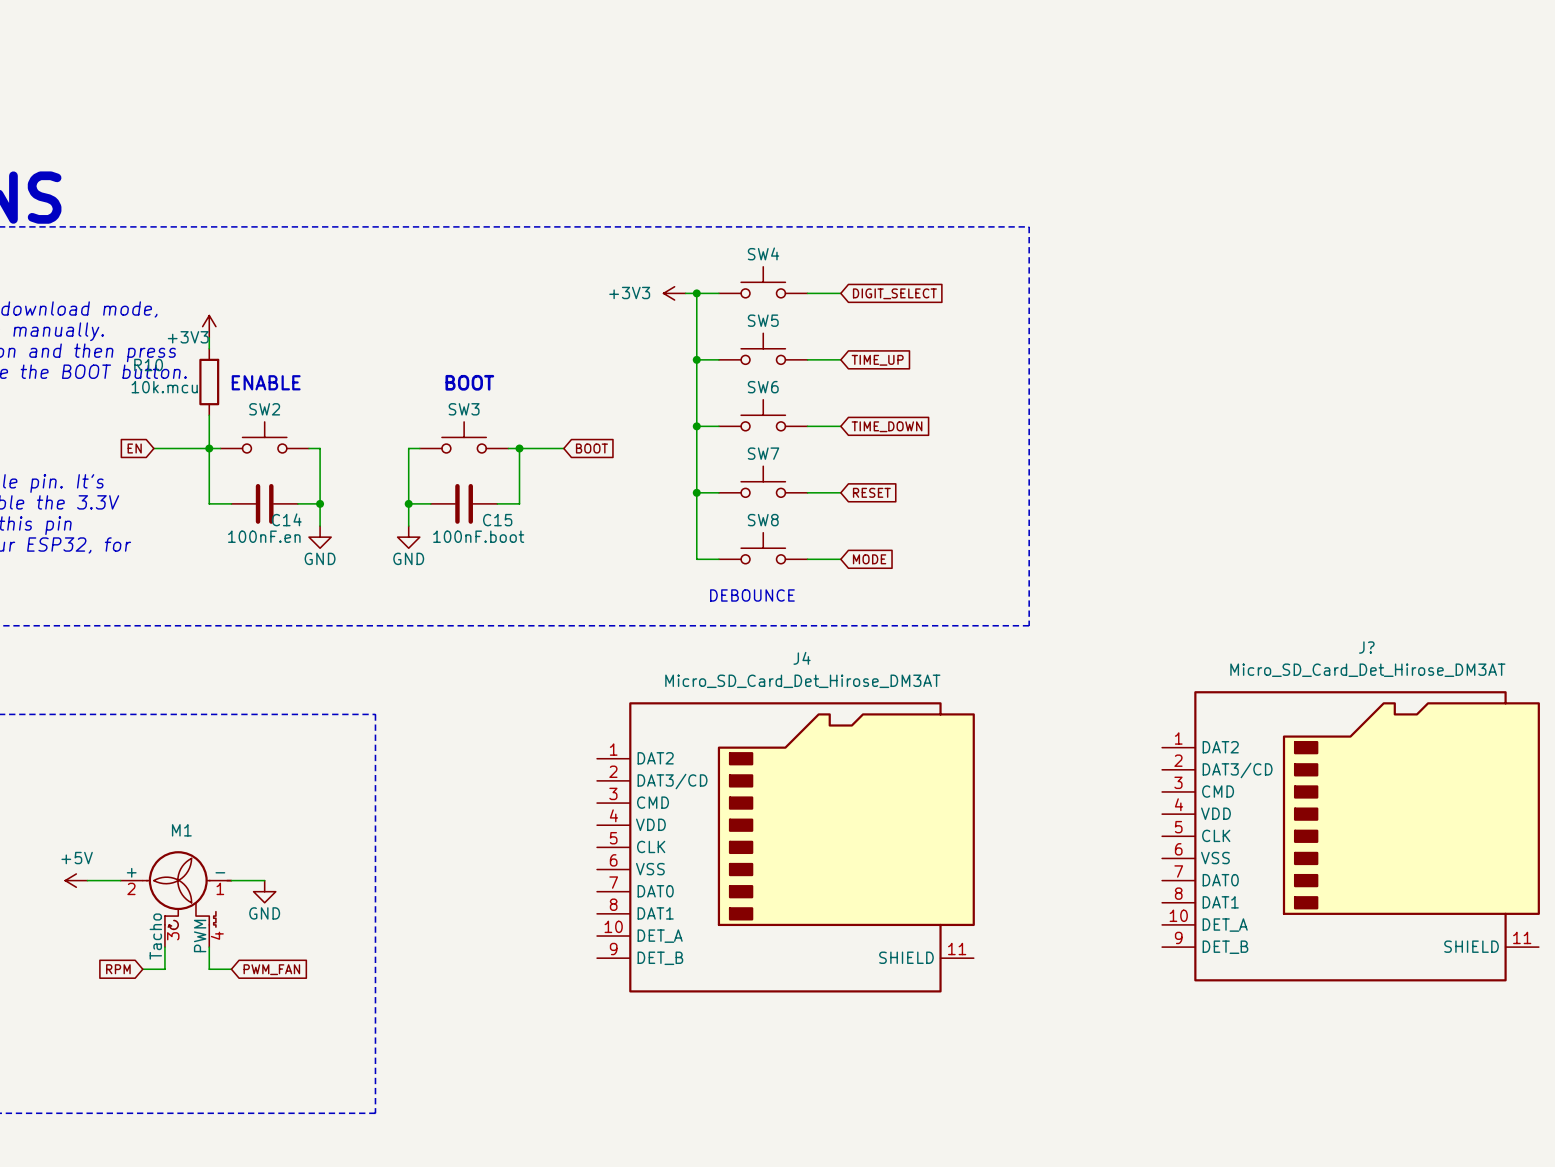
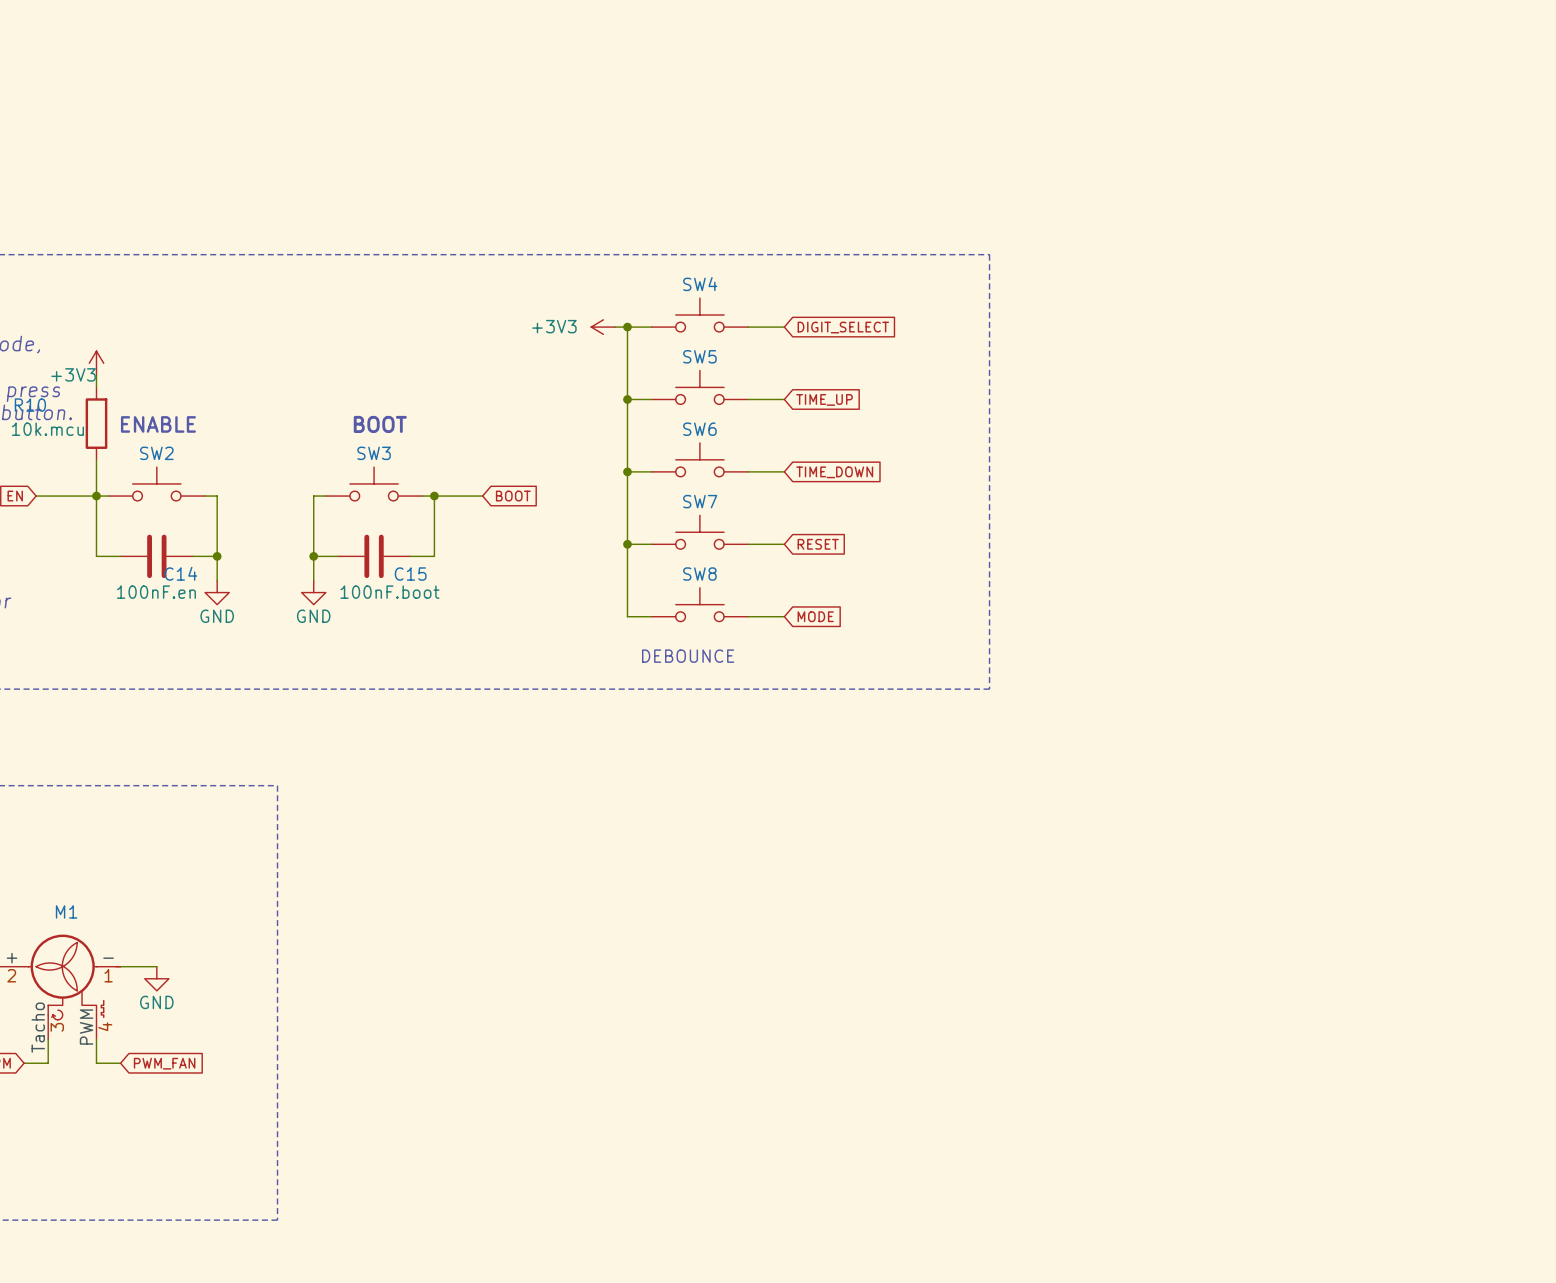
J?: Micro_SD_Card_Det_Hirose_DM3AT (1351, 836) -> none
J4: Micro_SD_Card_Det_Hirose_DM3AT (785, 847) -> none

